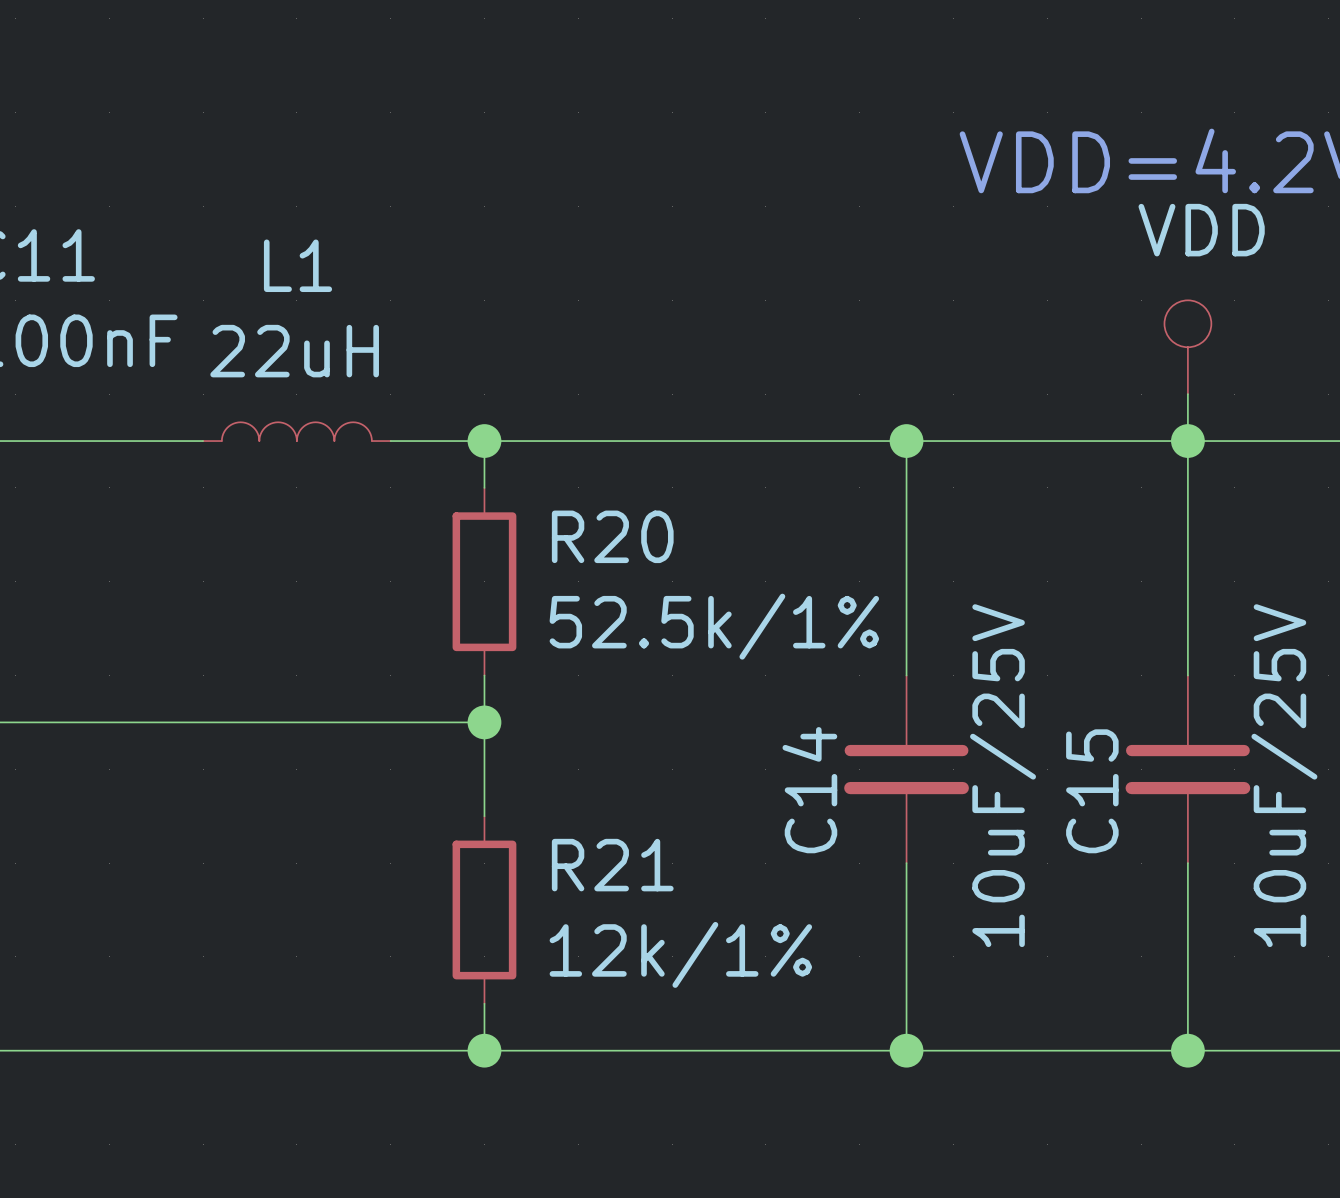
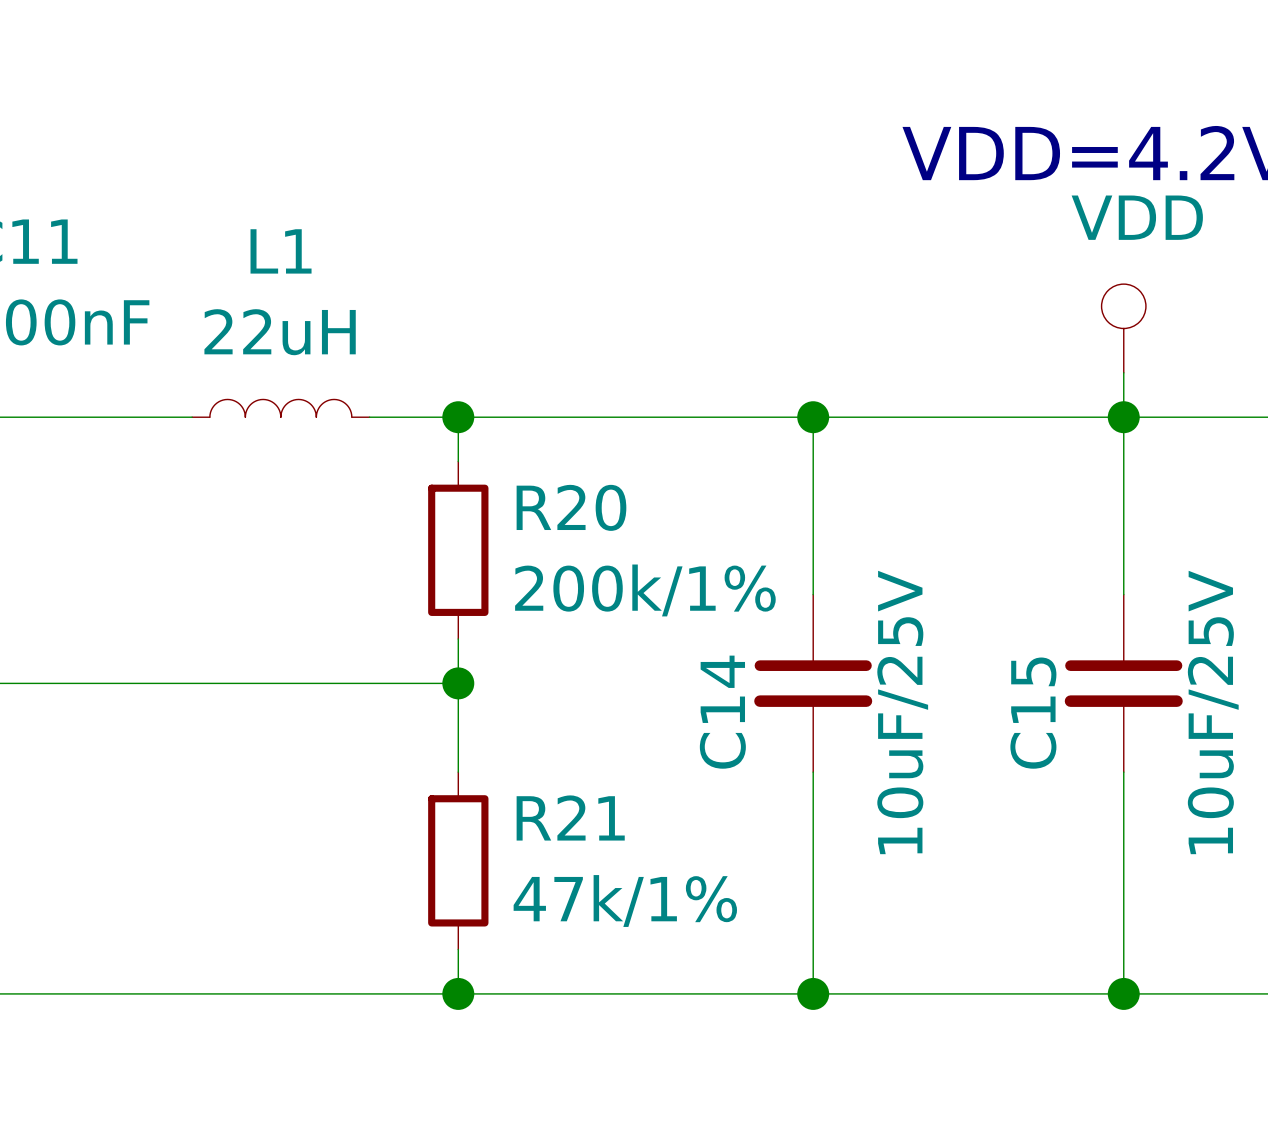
wire: (906, 441) (906, 675) -> (813, 772) (813, 993)
junction position: (906, 441) -> (813, 417)
R20 value: 52.5k/1% (714, 626) -> 200k/1% (645, 590)
C14 position: (906, 769) -> (813, 683)
C15 position: (1187, 769) -> (1123, 683)
wire: (906, 863) (906, 1050) -> (813, 417) (813, 594)
R21 value: 12k/1% (680, 954) -> 47k/1% (625, 901)
junction position: (906, 1050) -> (813, 993)

